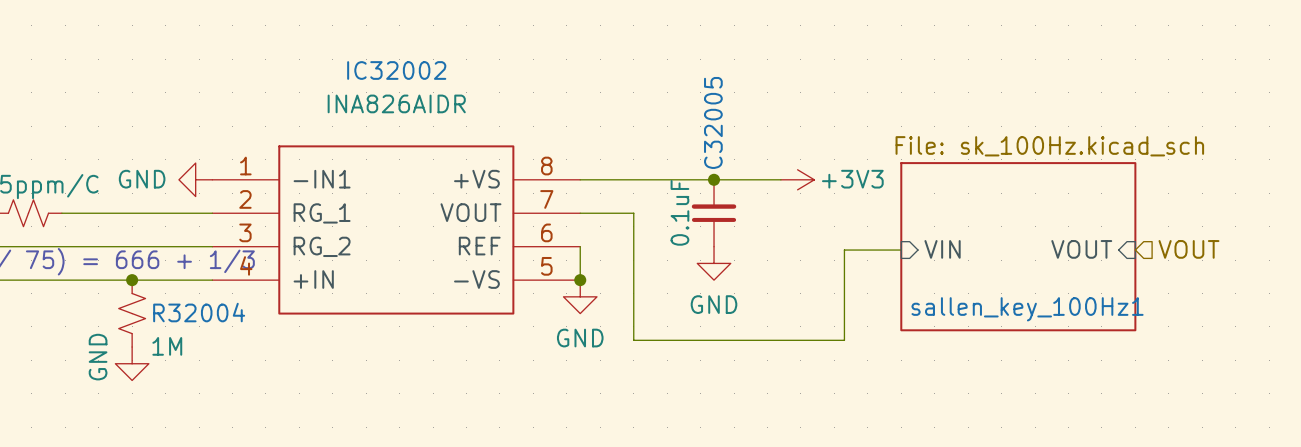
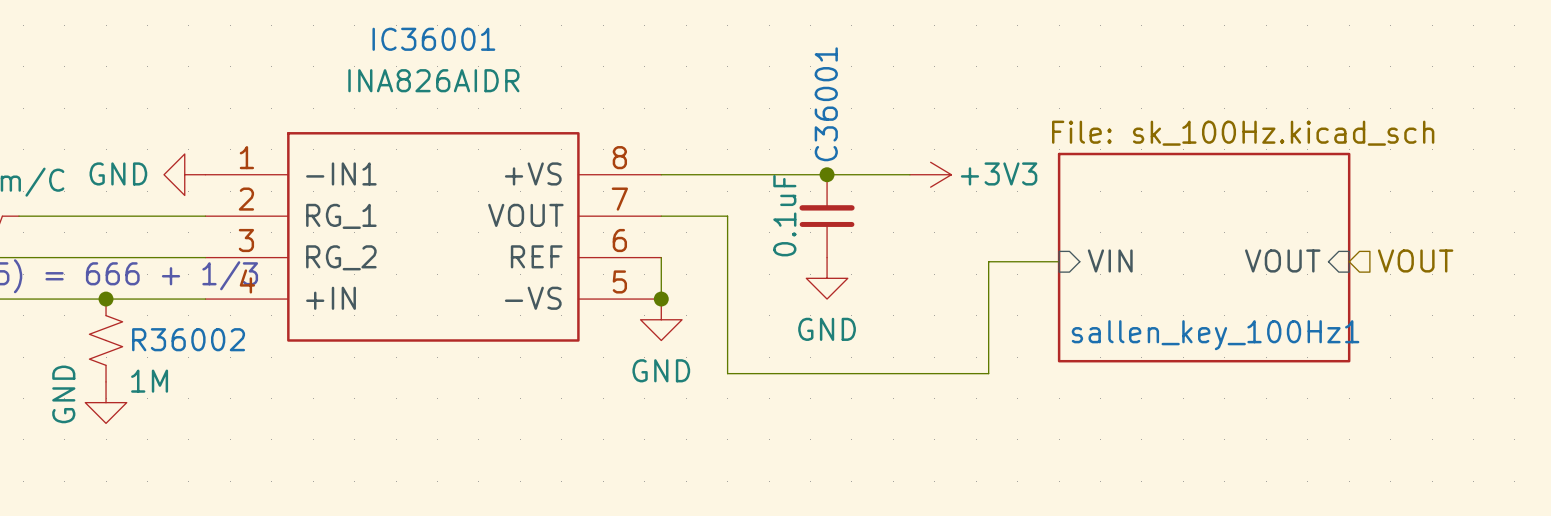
IC32002 name: IC32002 (396, 70) -> IC36001 (433, 39)
C32005 name: C32005 (713, 122) -> C36001 (826, 104)
R32004 name: R32004 (199, 312) -> R36002 (188, 339)

